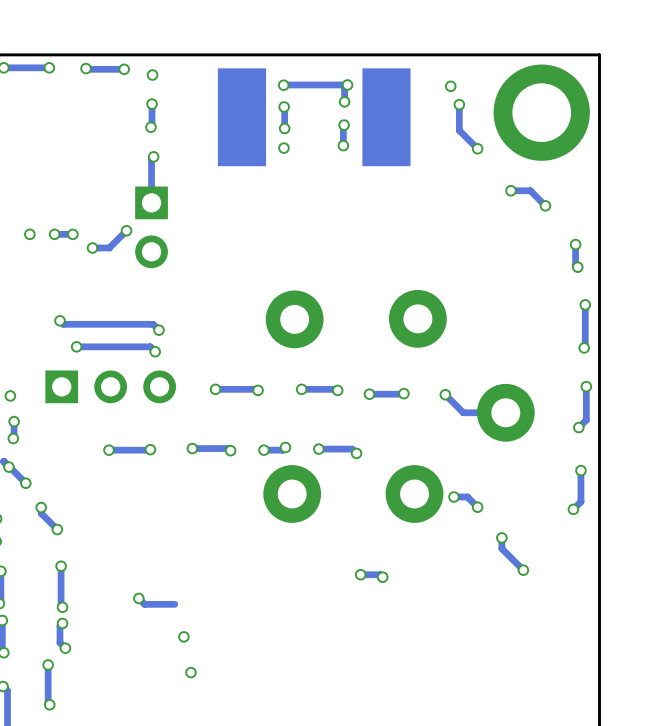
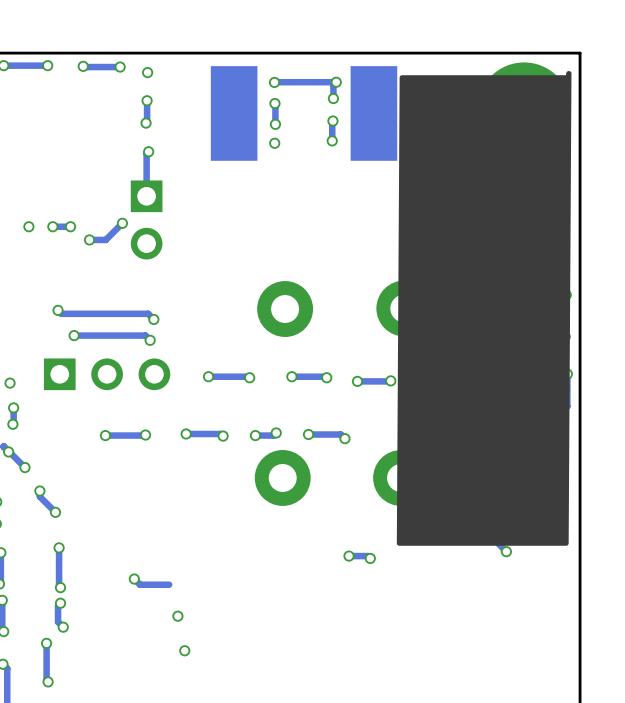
drawing: none -> [396, 71, 572, 546]

